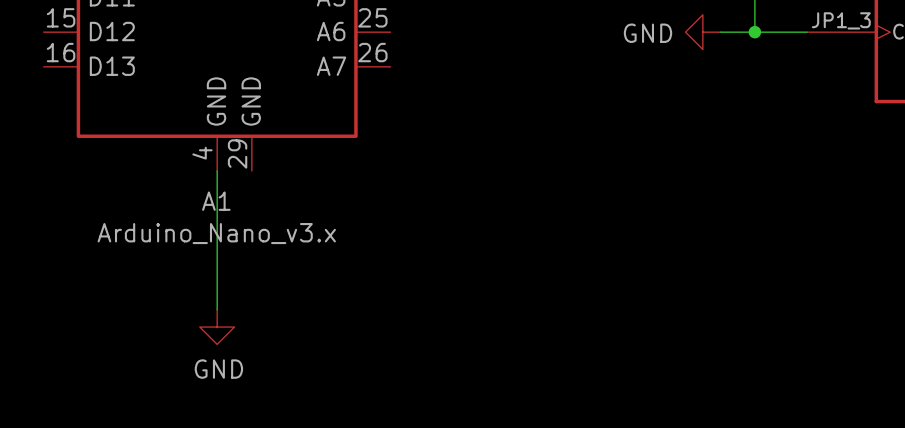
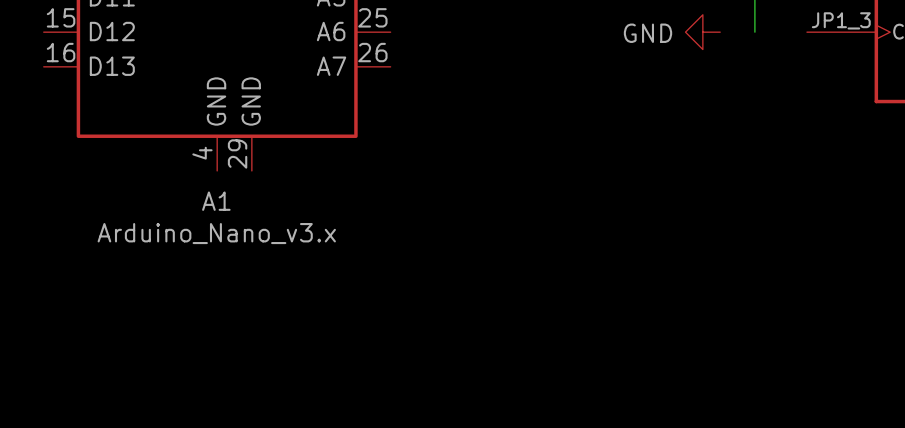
wire: (720, 32) (806, 32) -> none
junction: (754, 32) -> none
wire: (217, 170) (217, 309) -> none
power symbol: GND (217, 327) -> none

